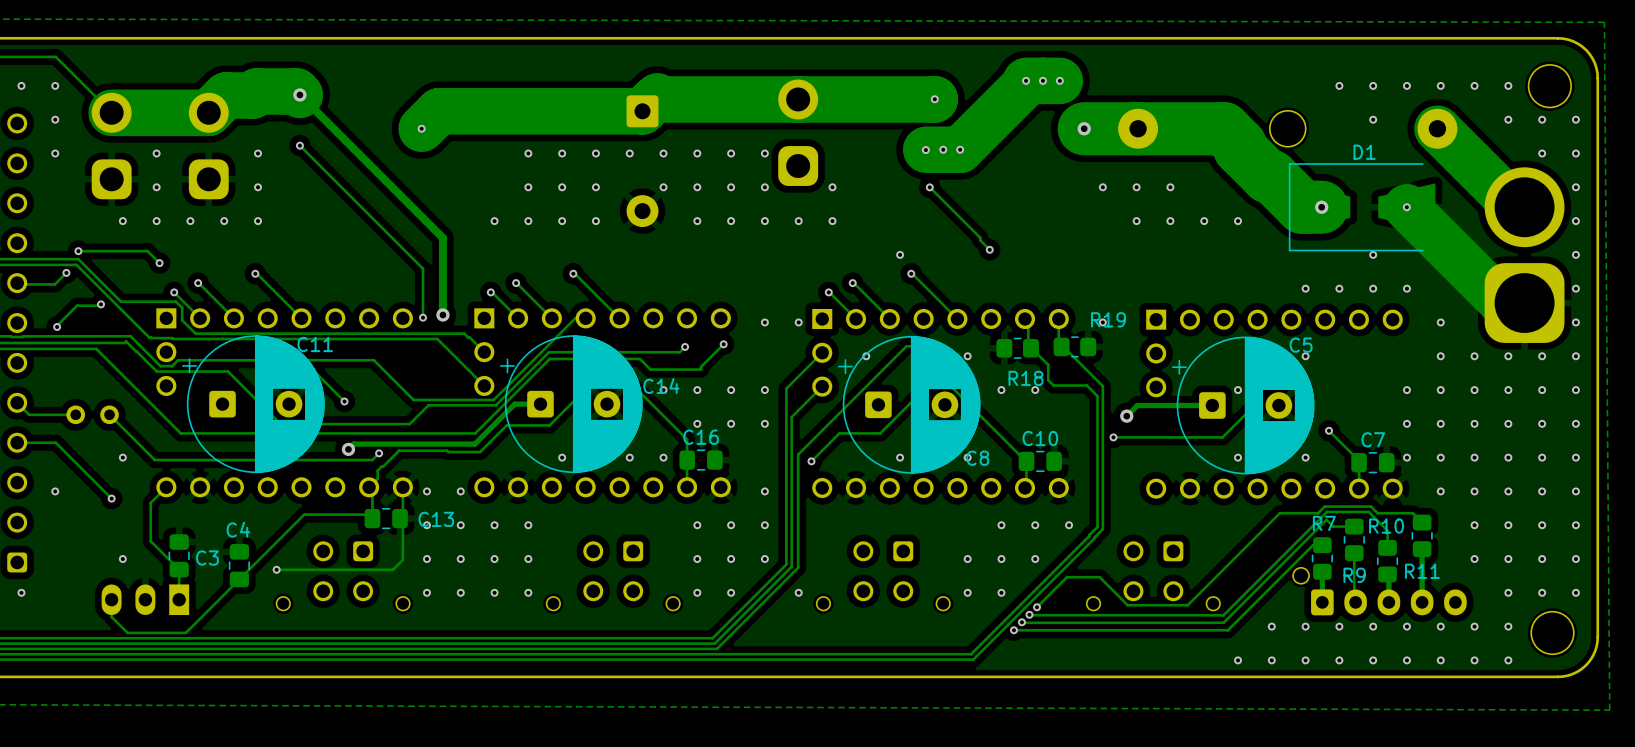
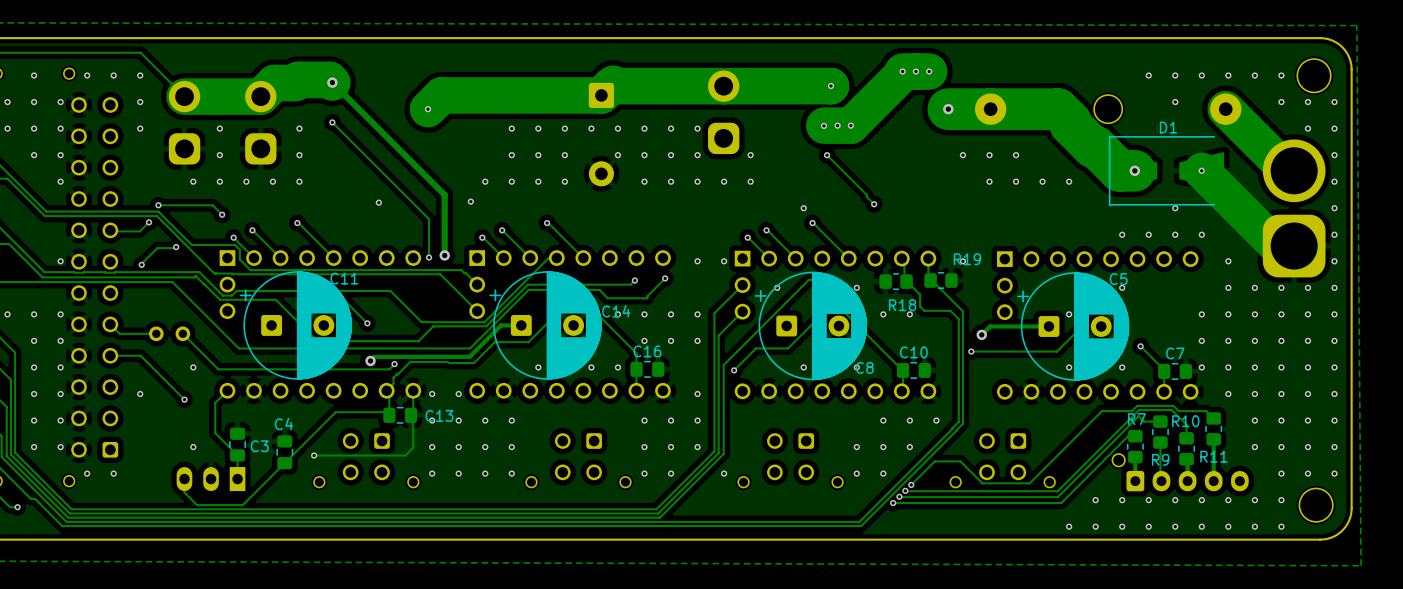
via: none -> (470, 201)
via: none -> (378, 202)

